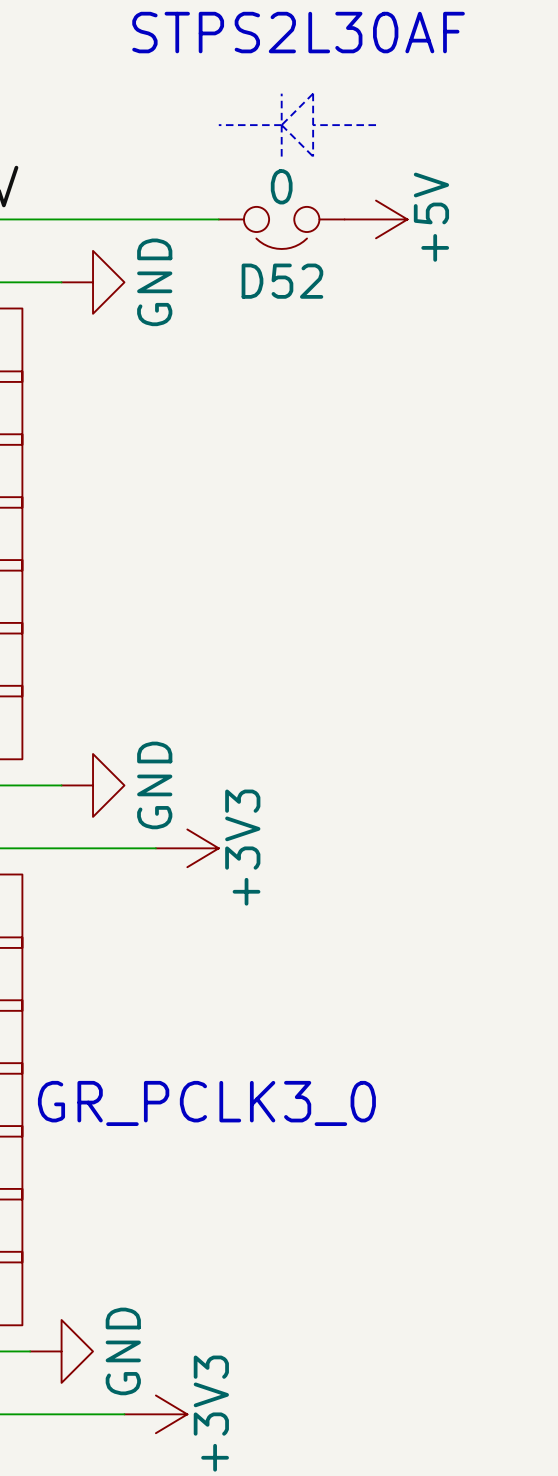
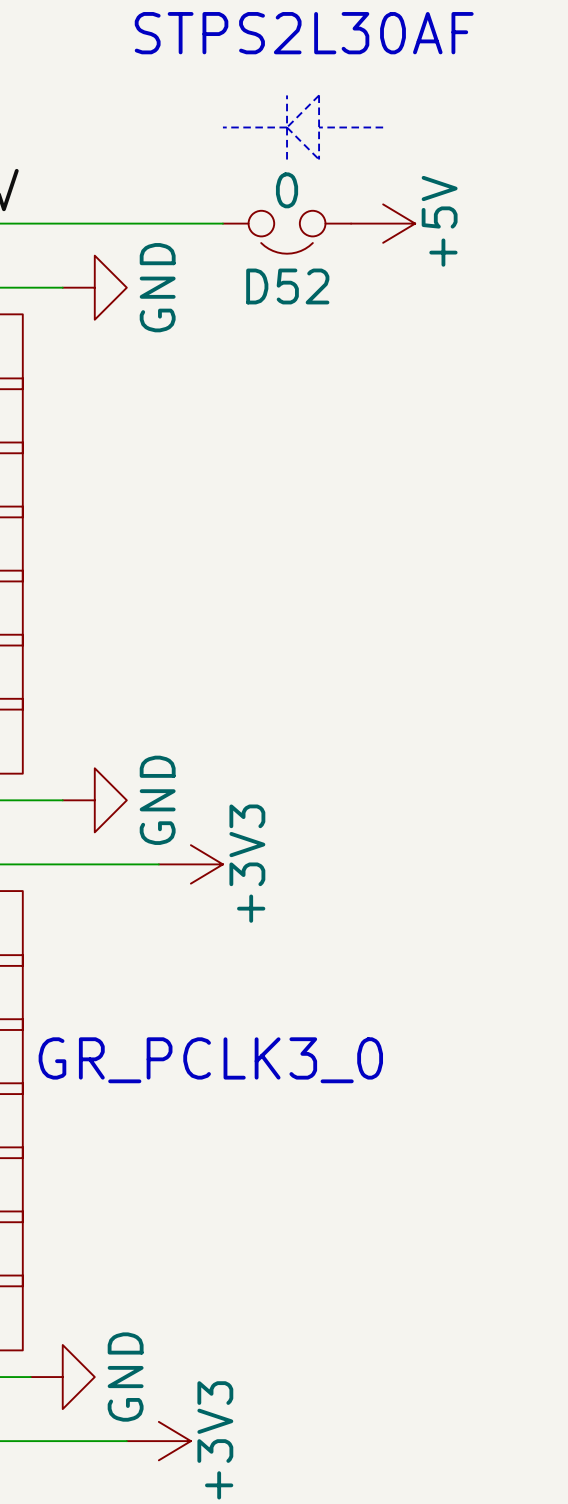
text position: GR_PCLK3_0 (206, 1103) -> GR_PCLK3_0 (210, 1060)

